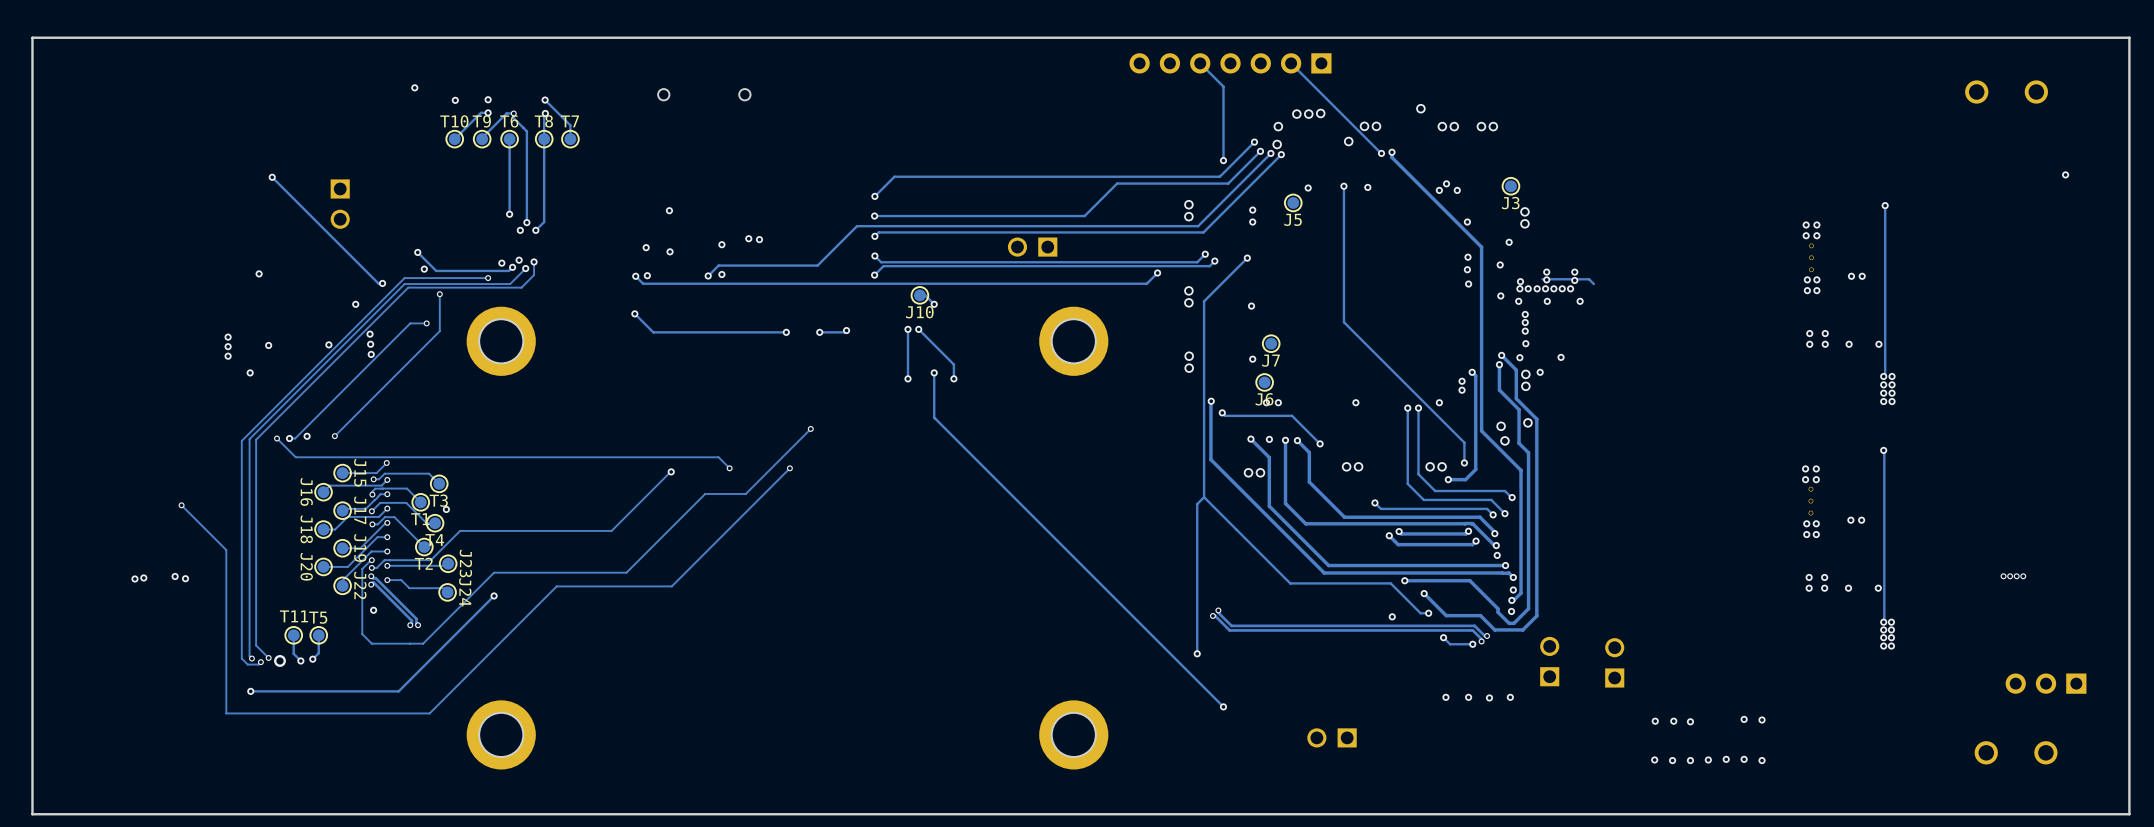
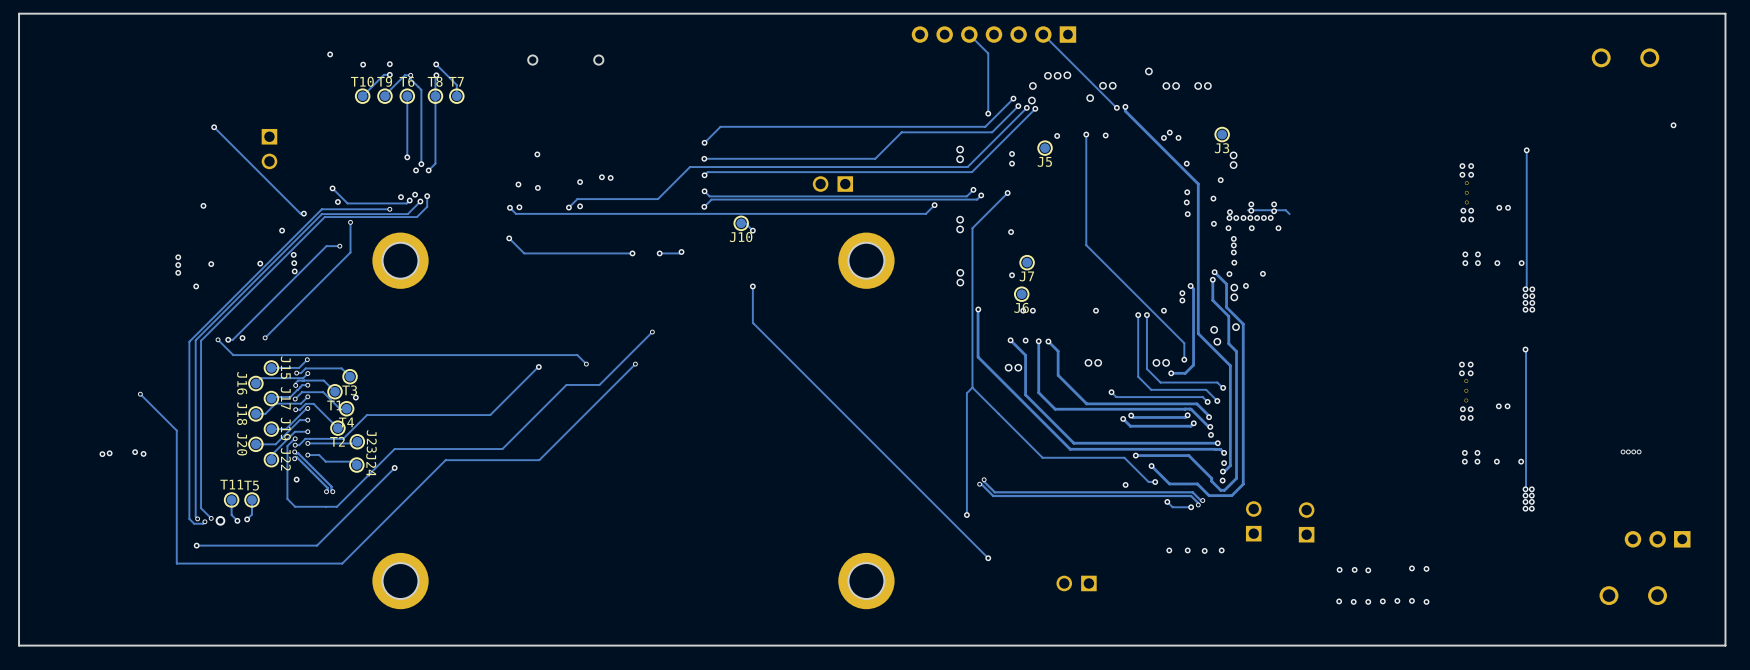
track: (907, 329) (907, 378) -> none
via: (907, 329) -> none
track: (918, 329) (953, 364) (953, 378) -> none
via: (918, 329) -> none
via: (907, 378) -> none
via: (953, 378) -> none
track: (1222, 412) (1225, 415) (1292, 415) (1320, 443) -> none
via: (1222, 412) -> none
via: (1320, 443) -> none

